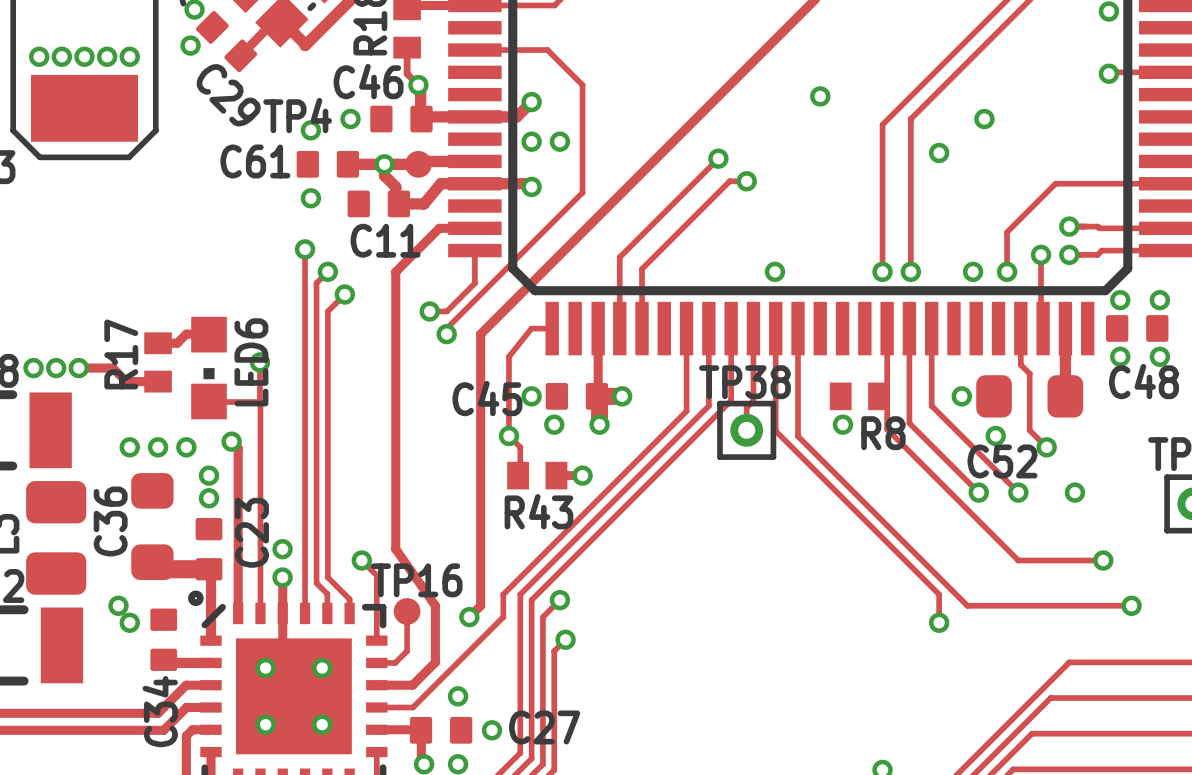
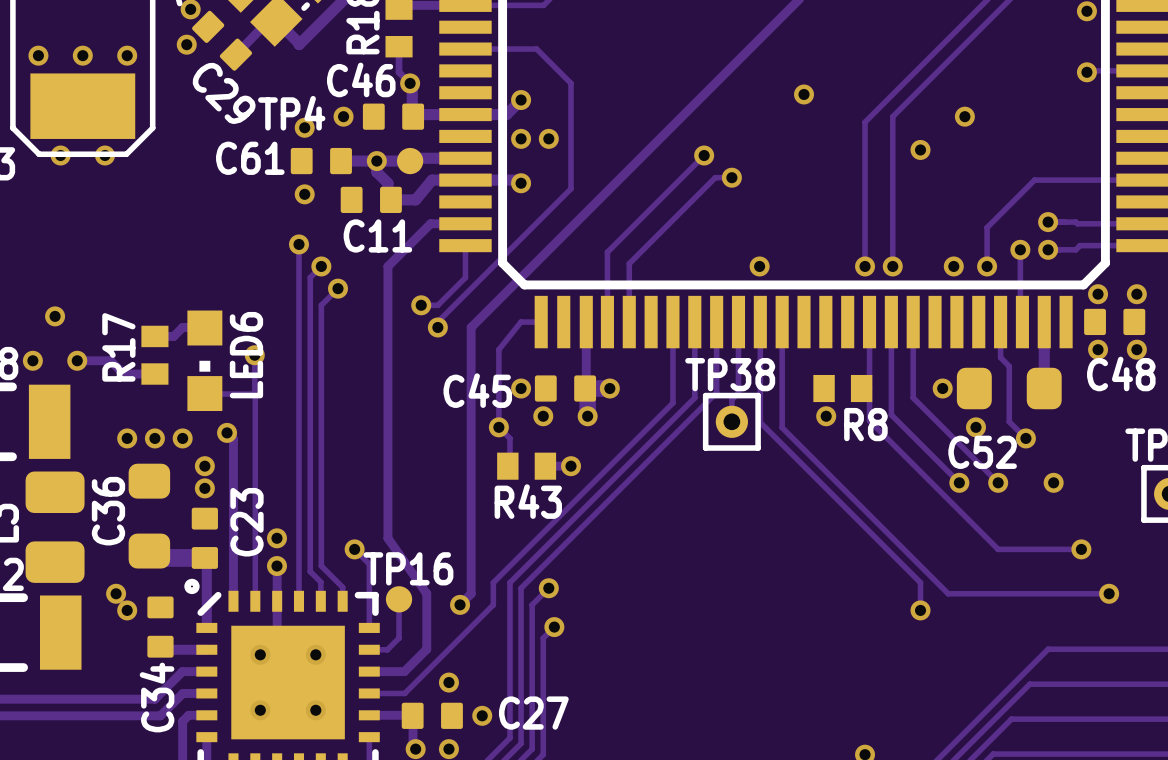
via: (61, 56) -> none
via: (107, 56) -> none
via: none -> (60, 155)
via: none -> (105, 155)
via position: (56, 368) -> (55, 316)

